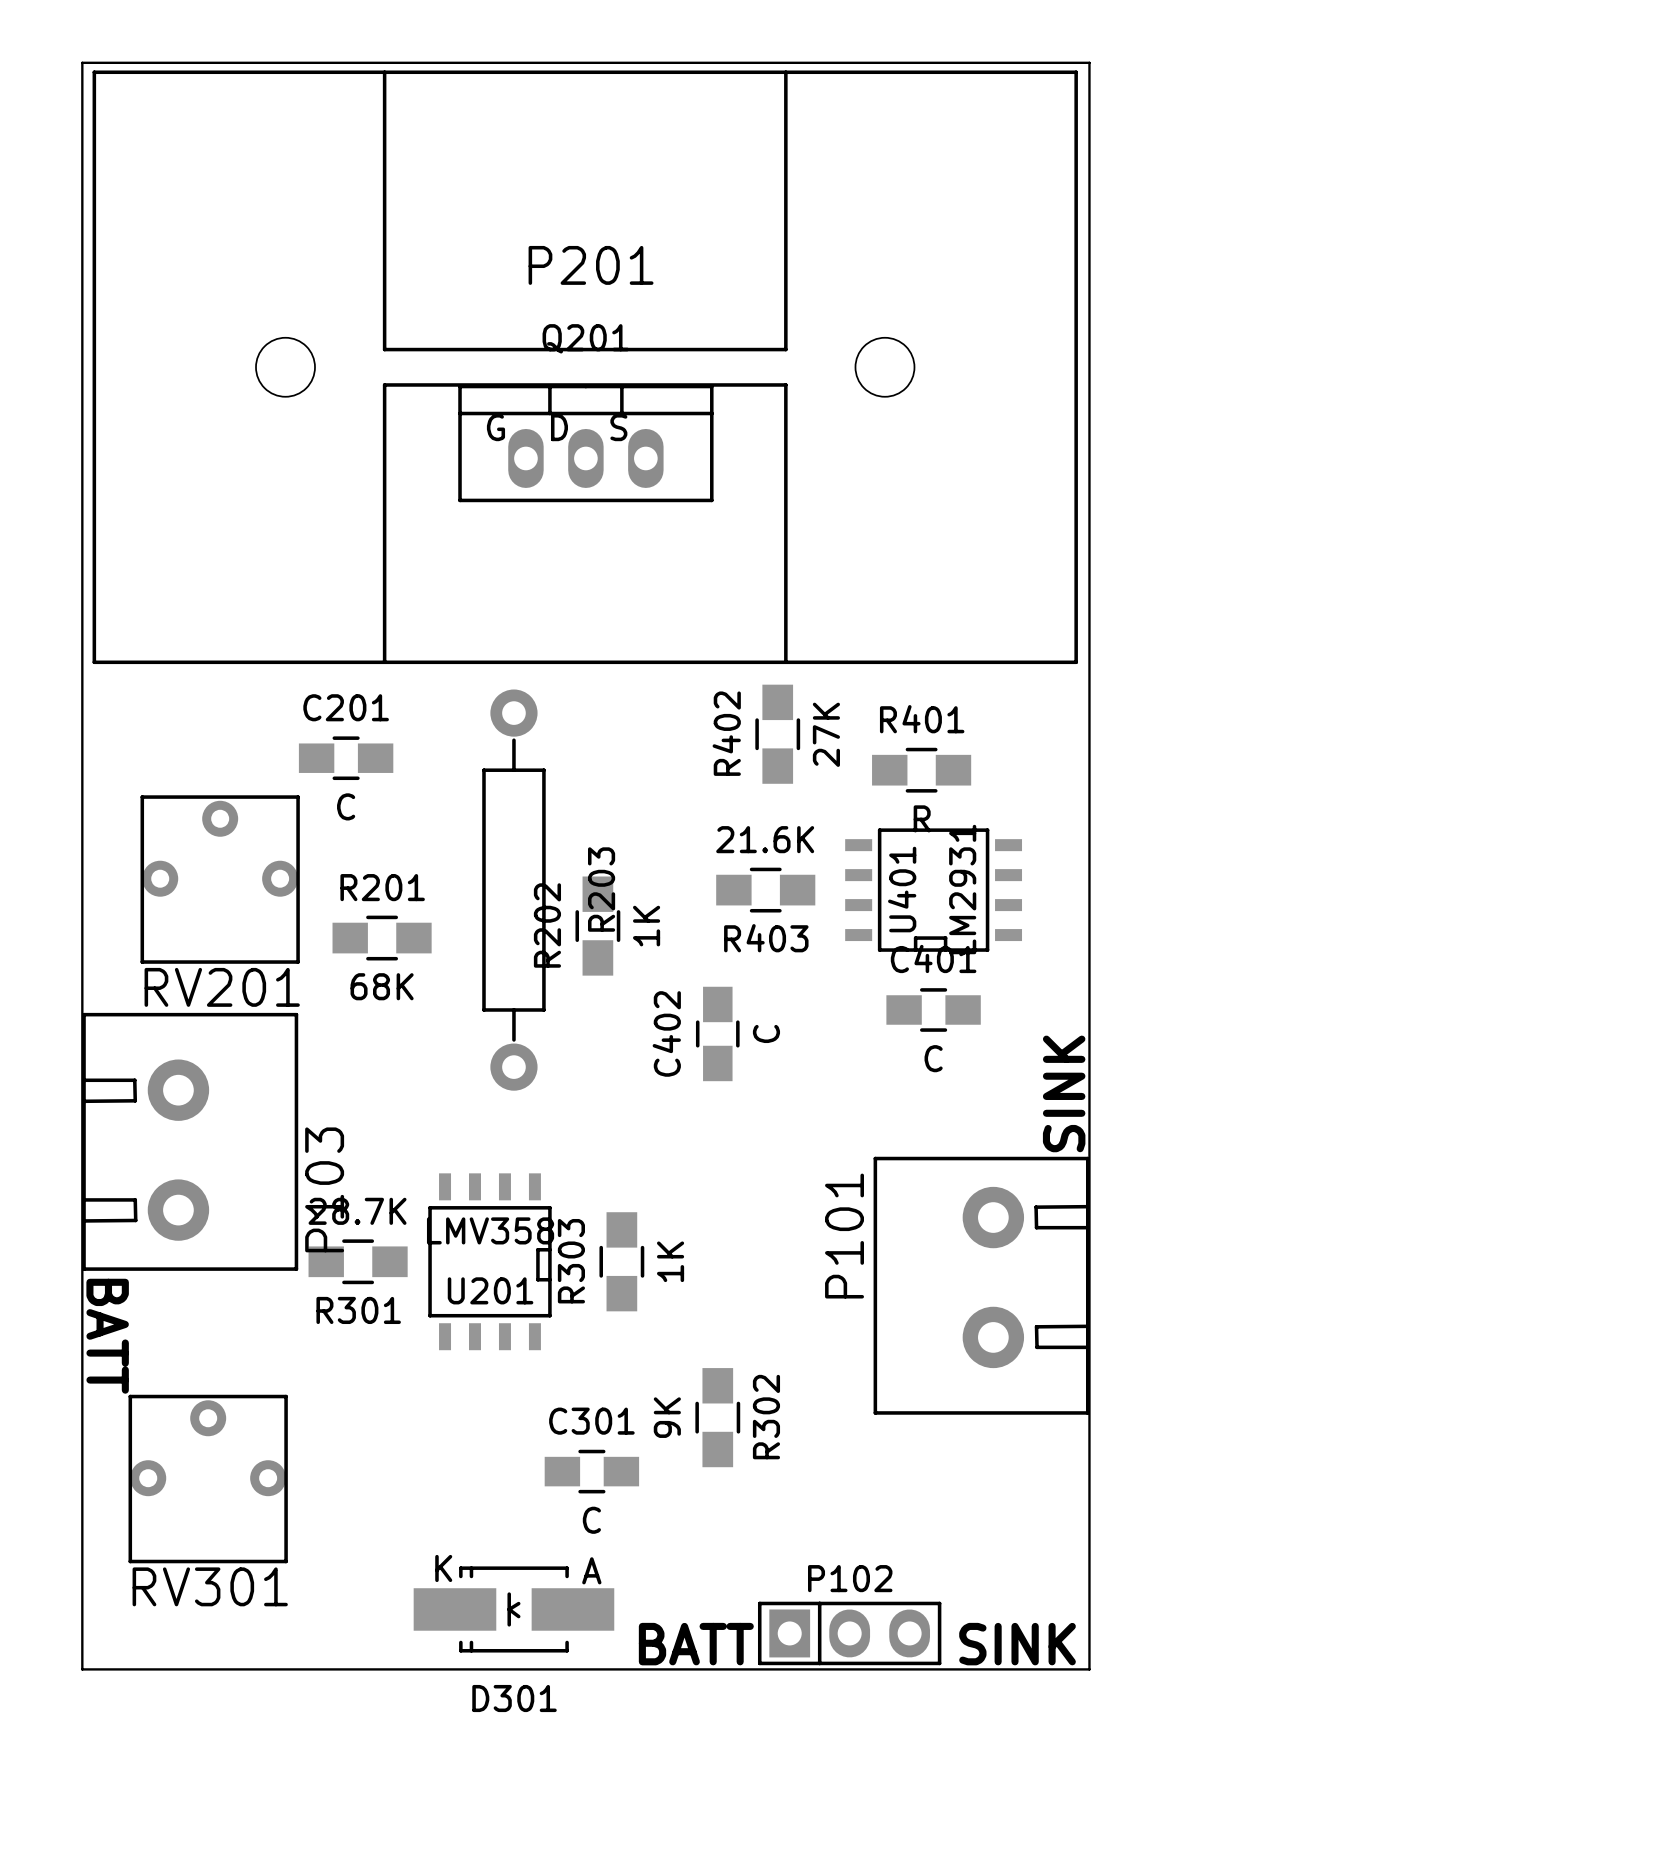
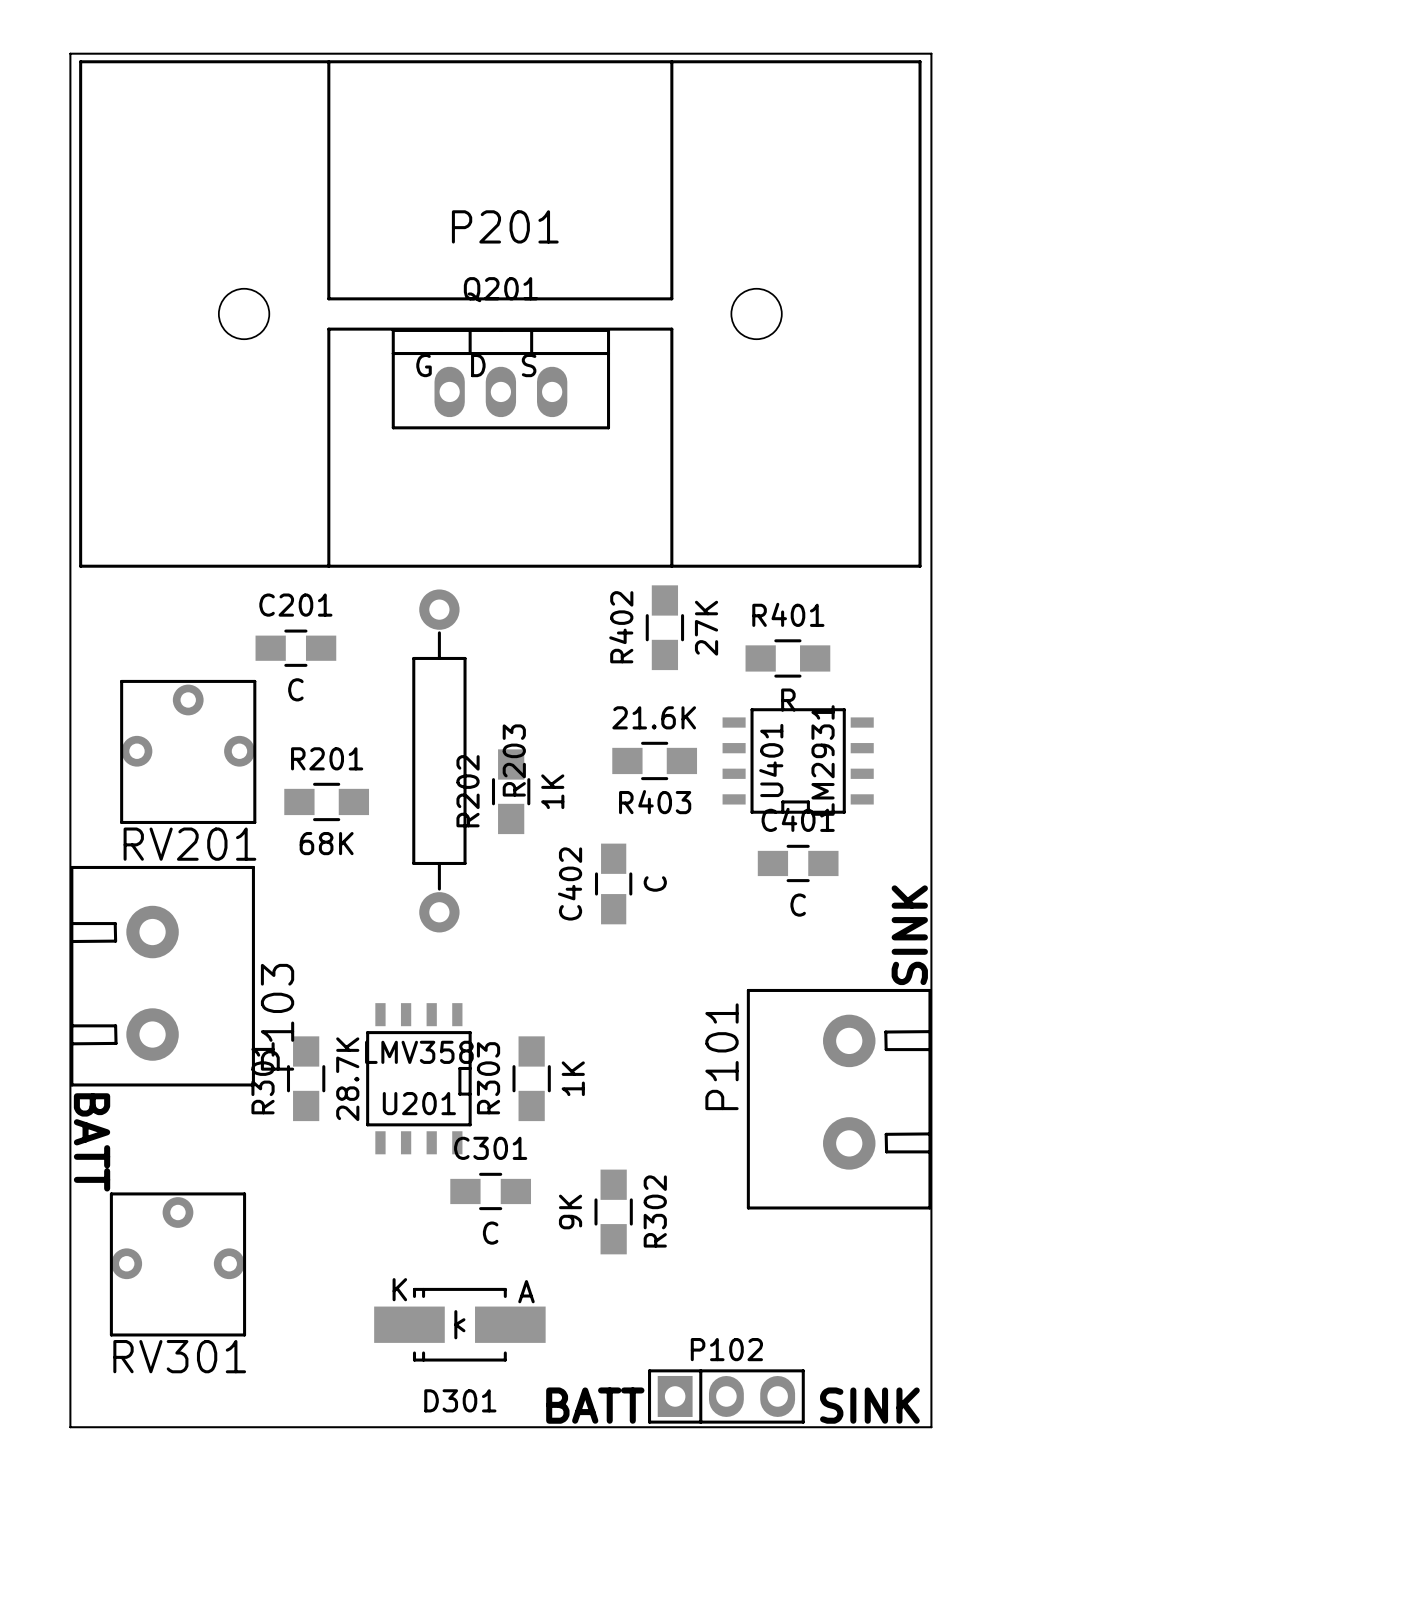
R301 rotation: 0° (358, 1261) -> 90° clockwise (306, 1078)
C301 position: (591, 1471) -> (490, 1191)
D301 position: (513, 1609) -> (459, 1324)

